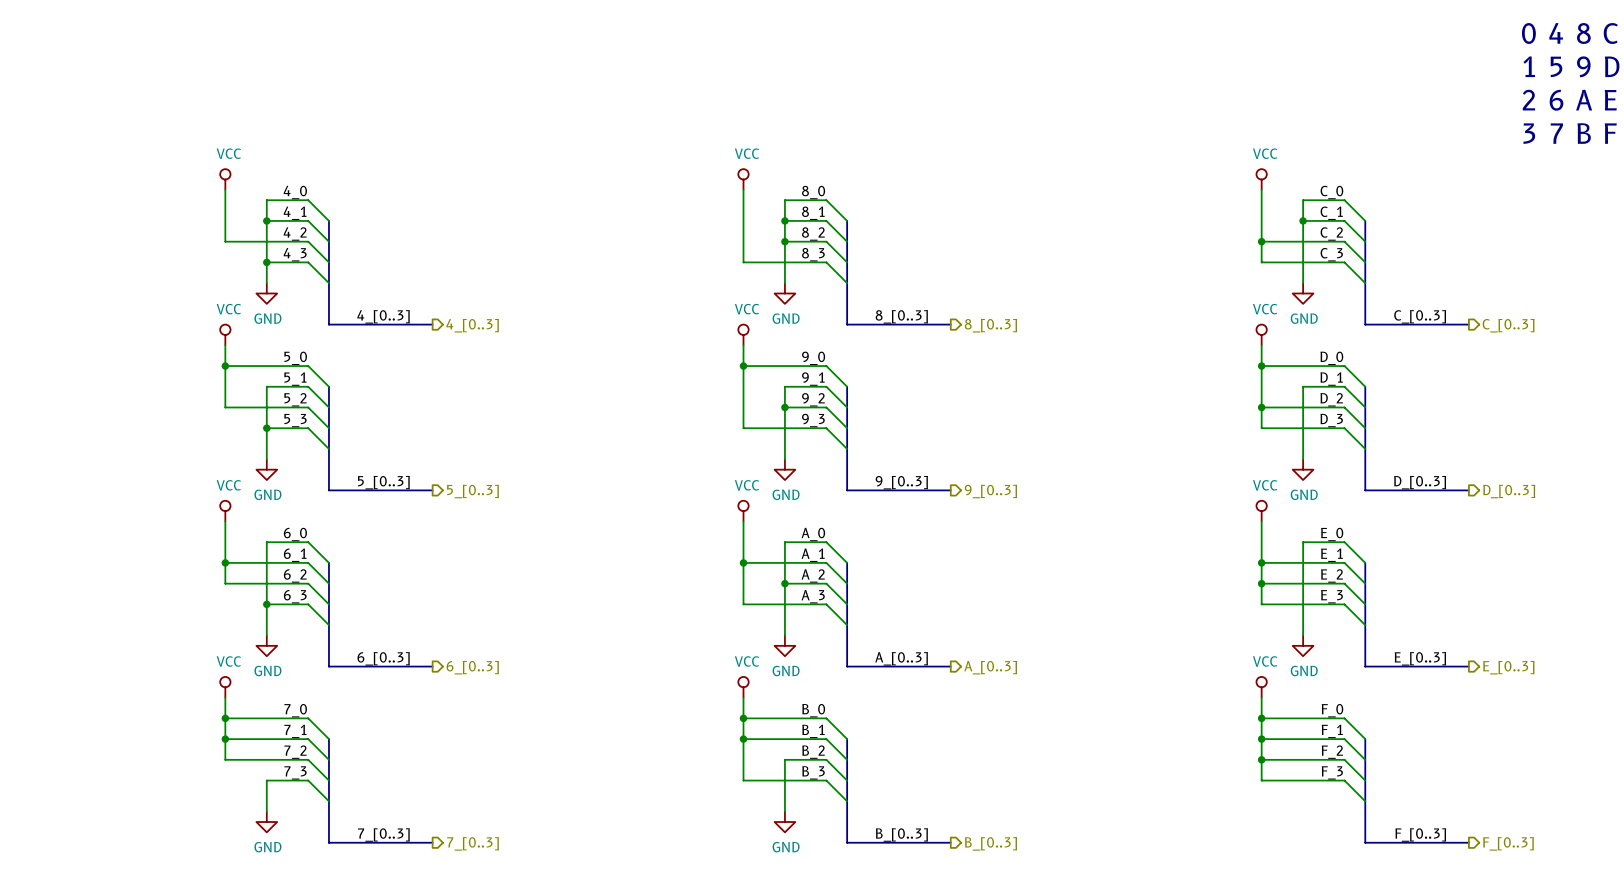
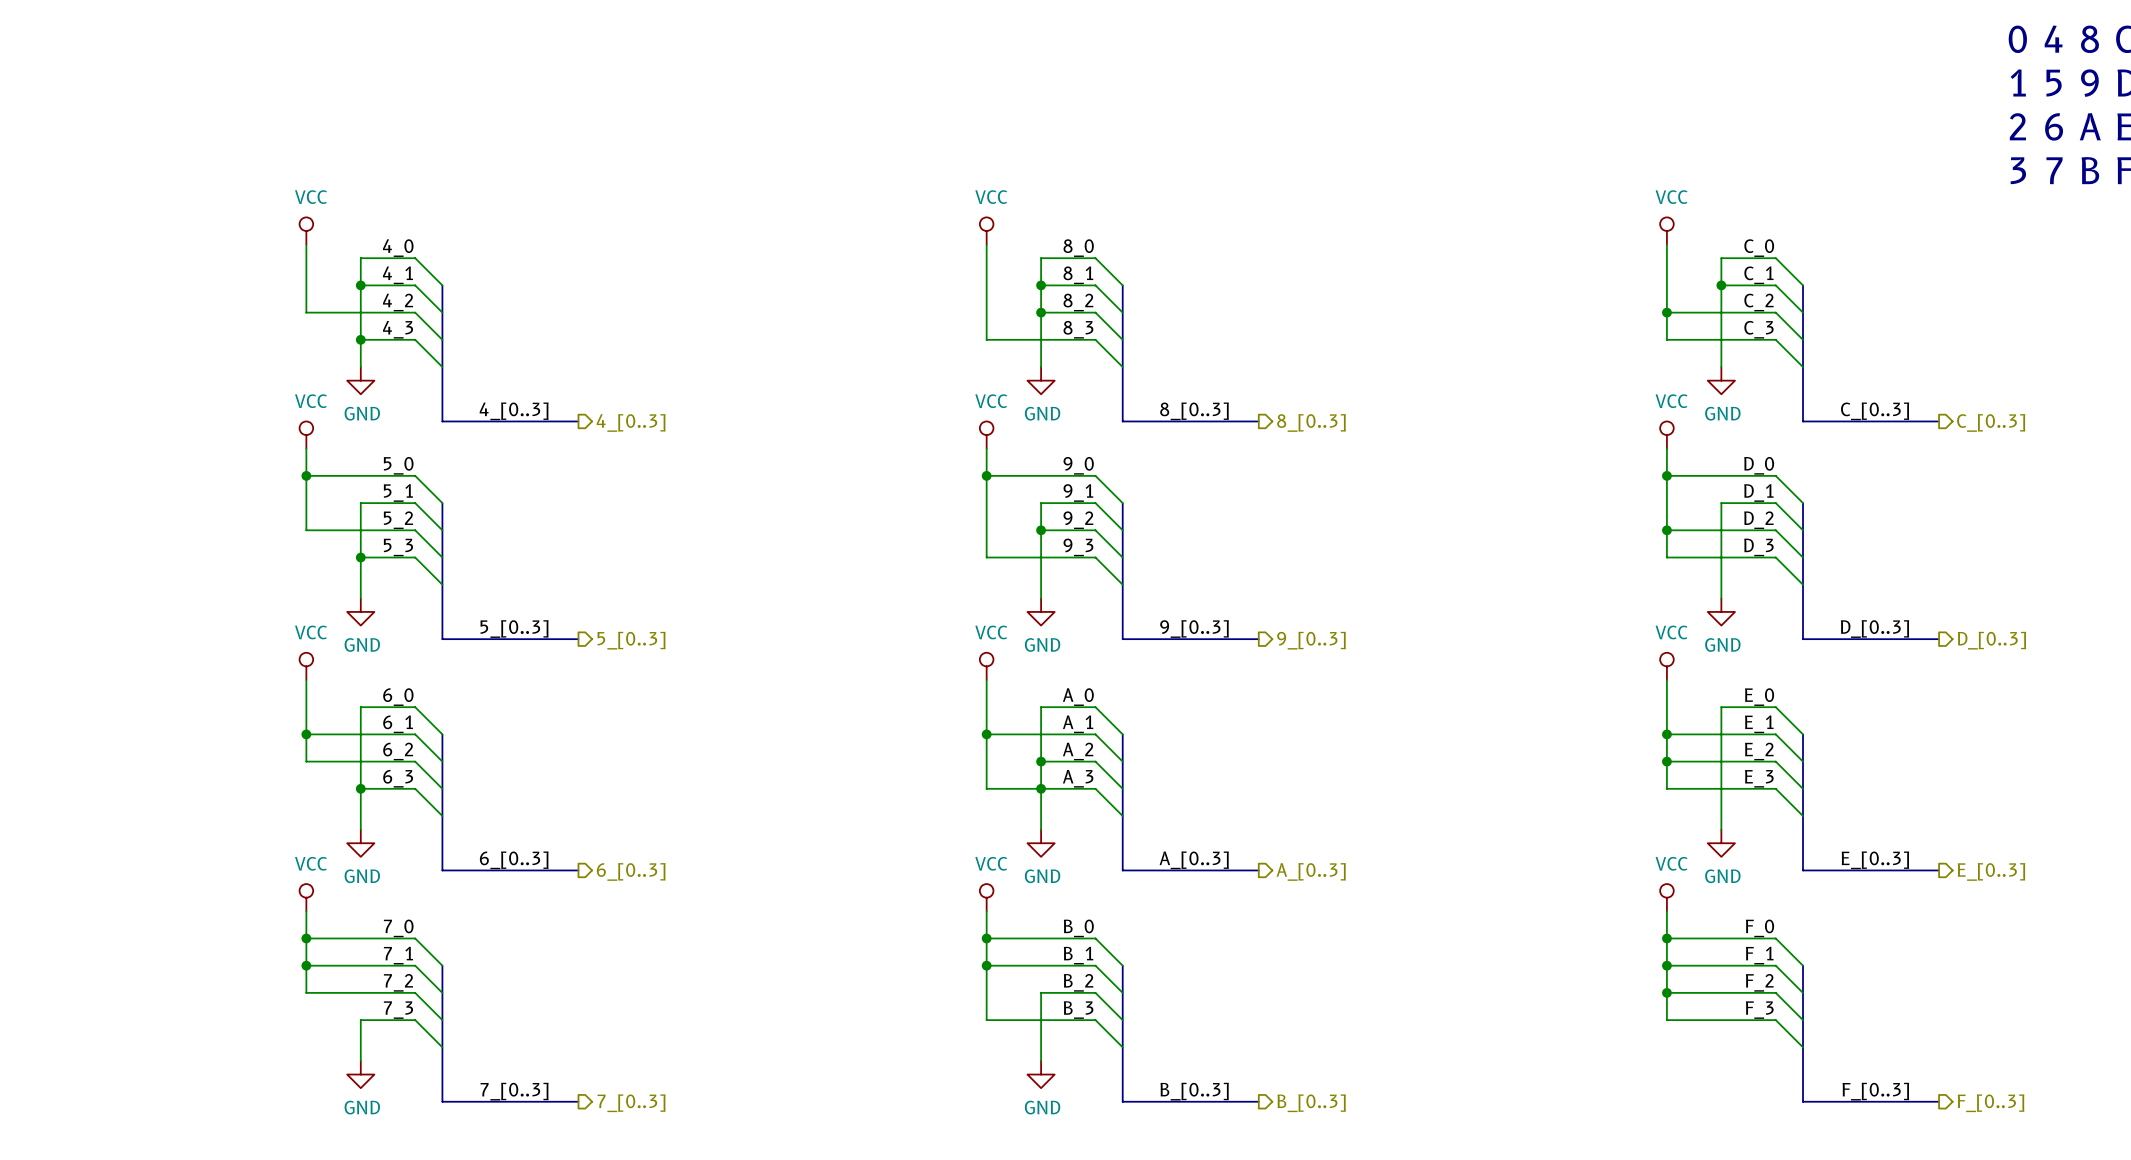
junction: none -> (1041, 788)

